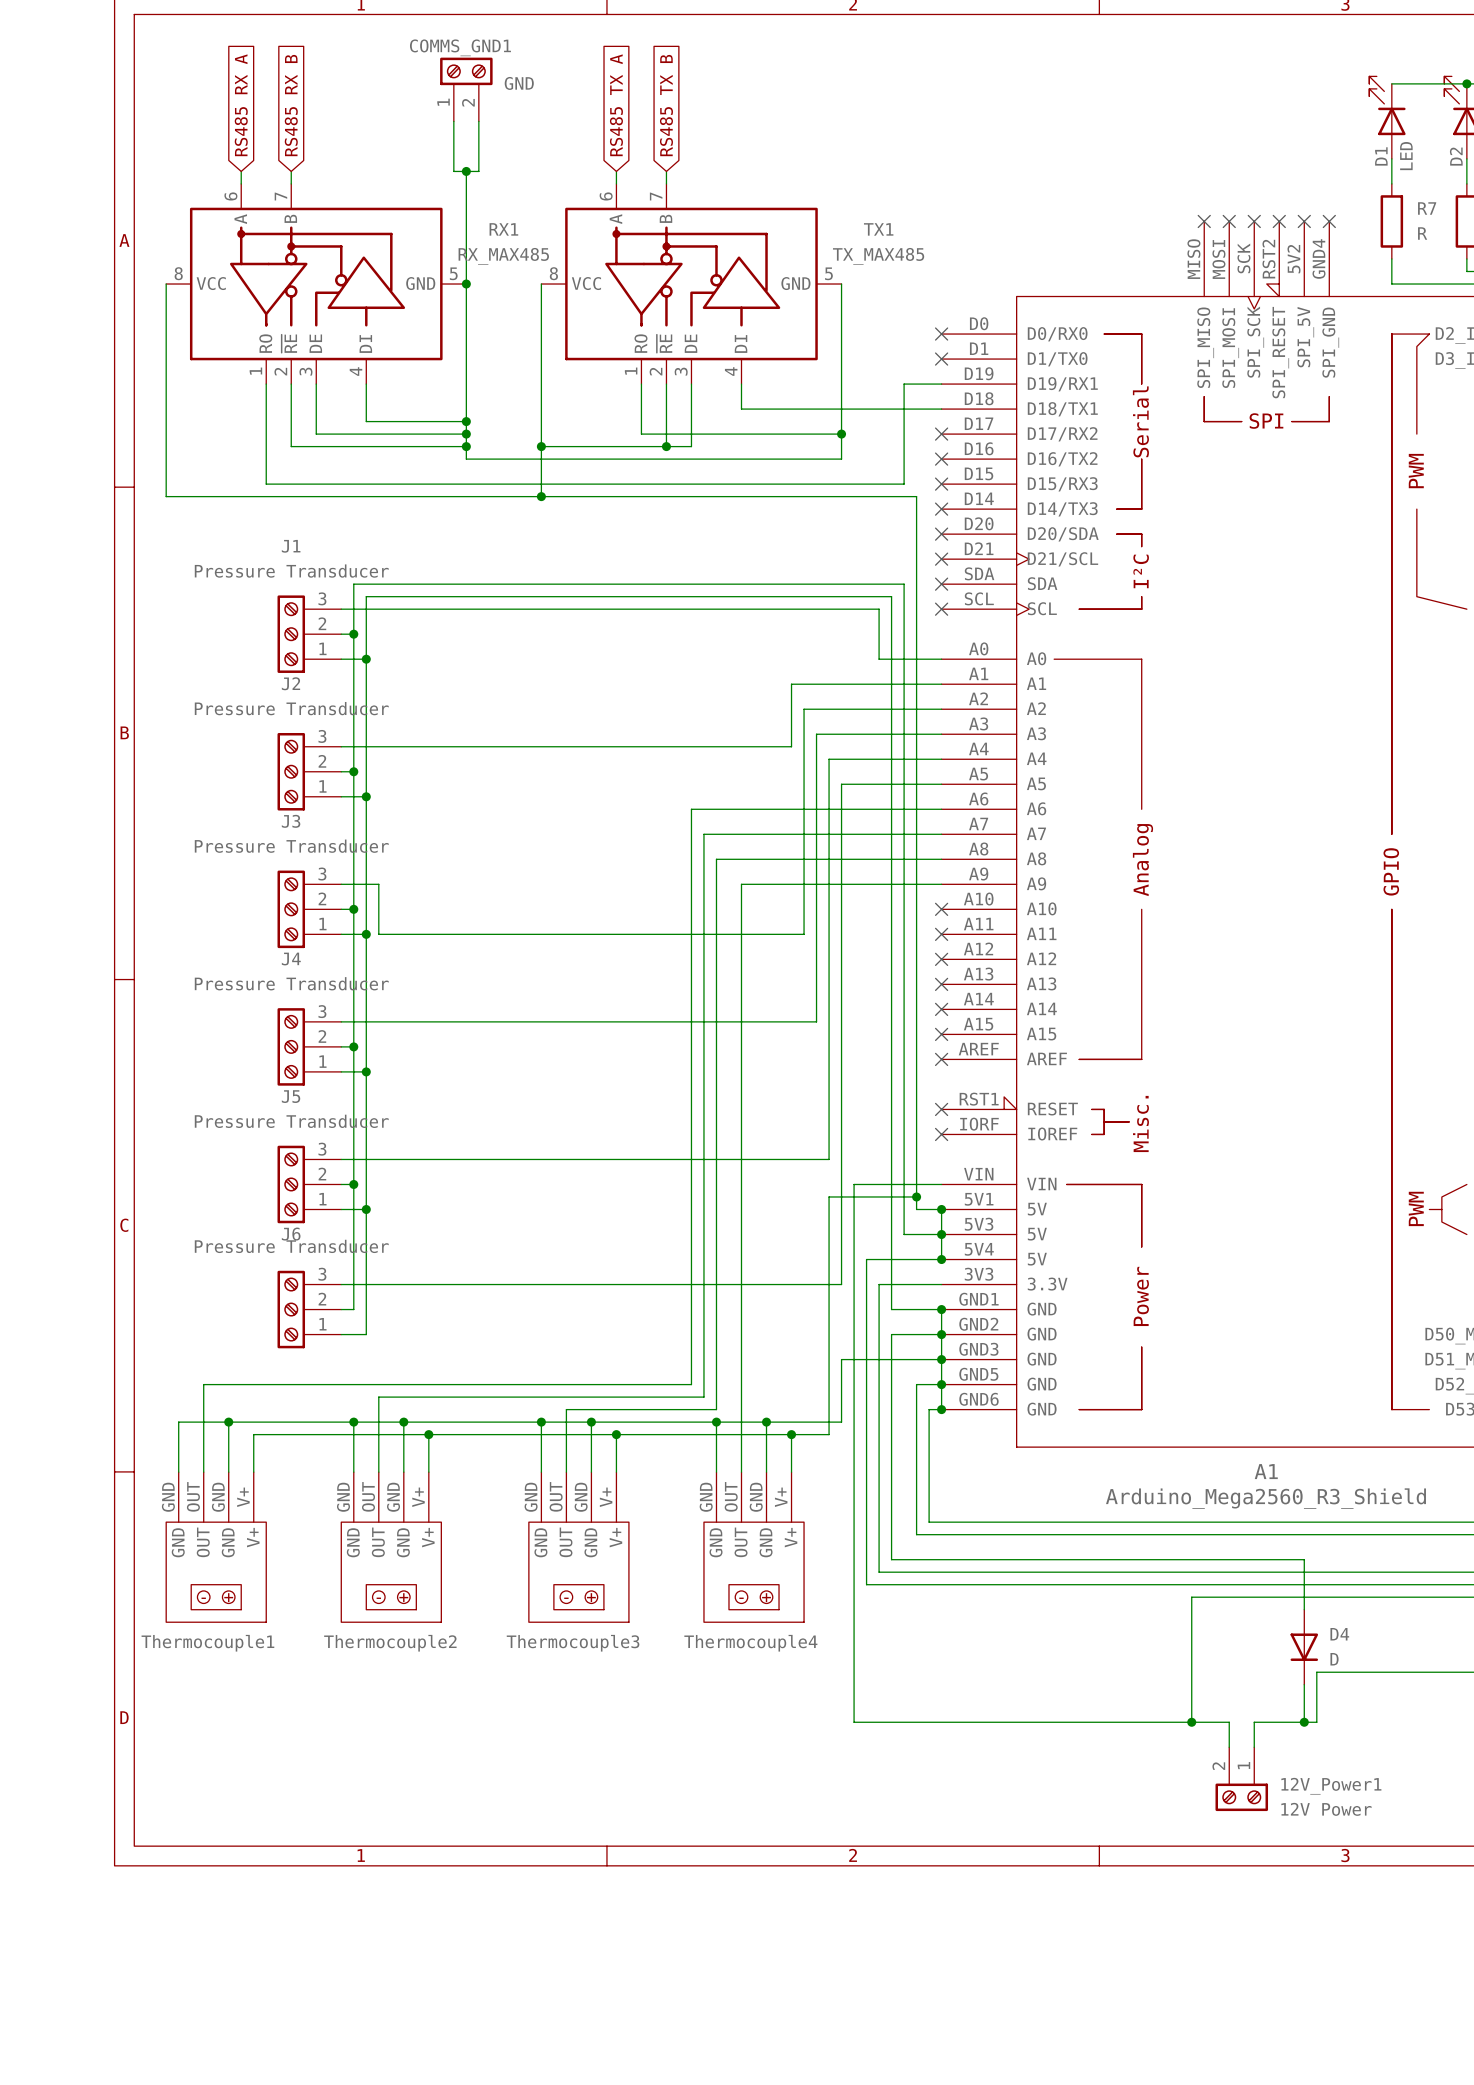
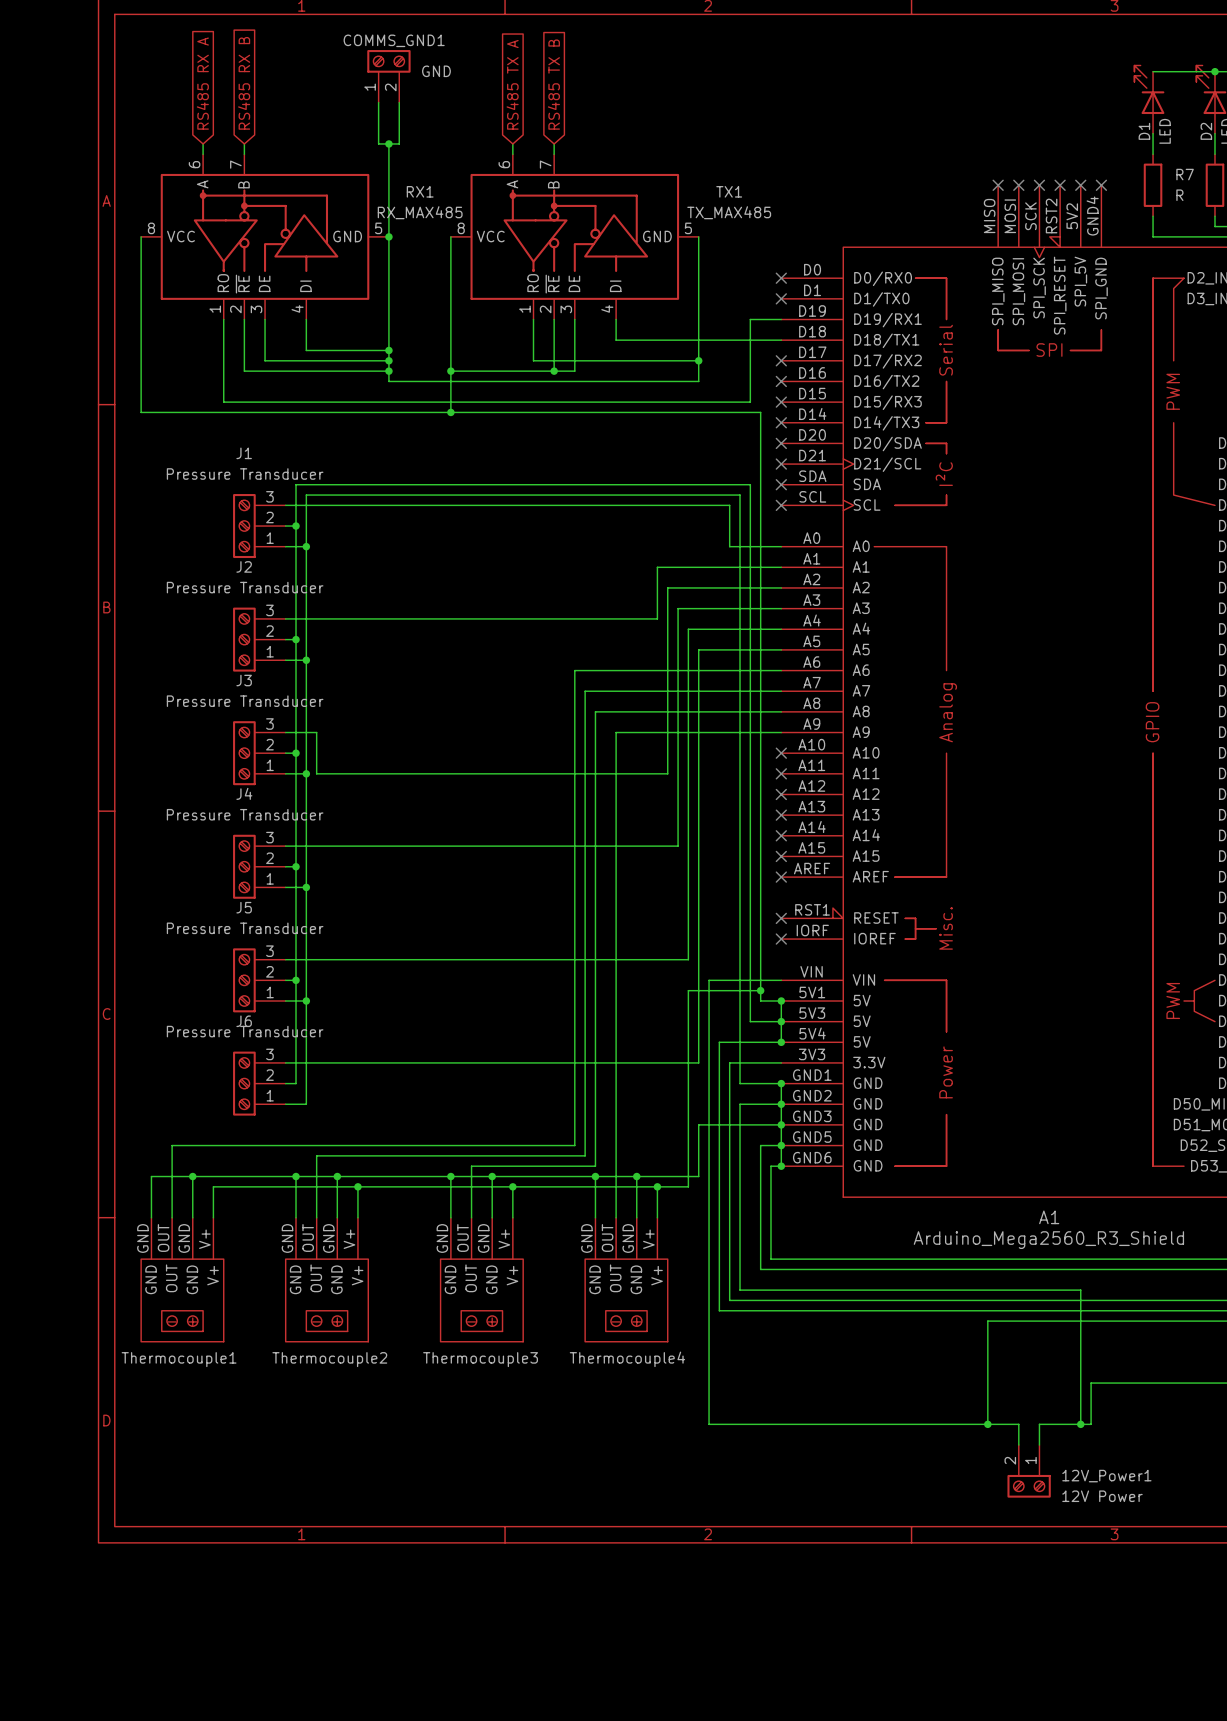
D4: D (1304, 1647) -> none

